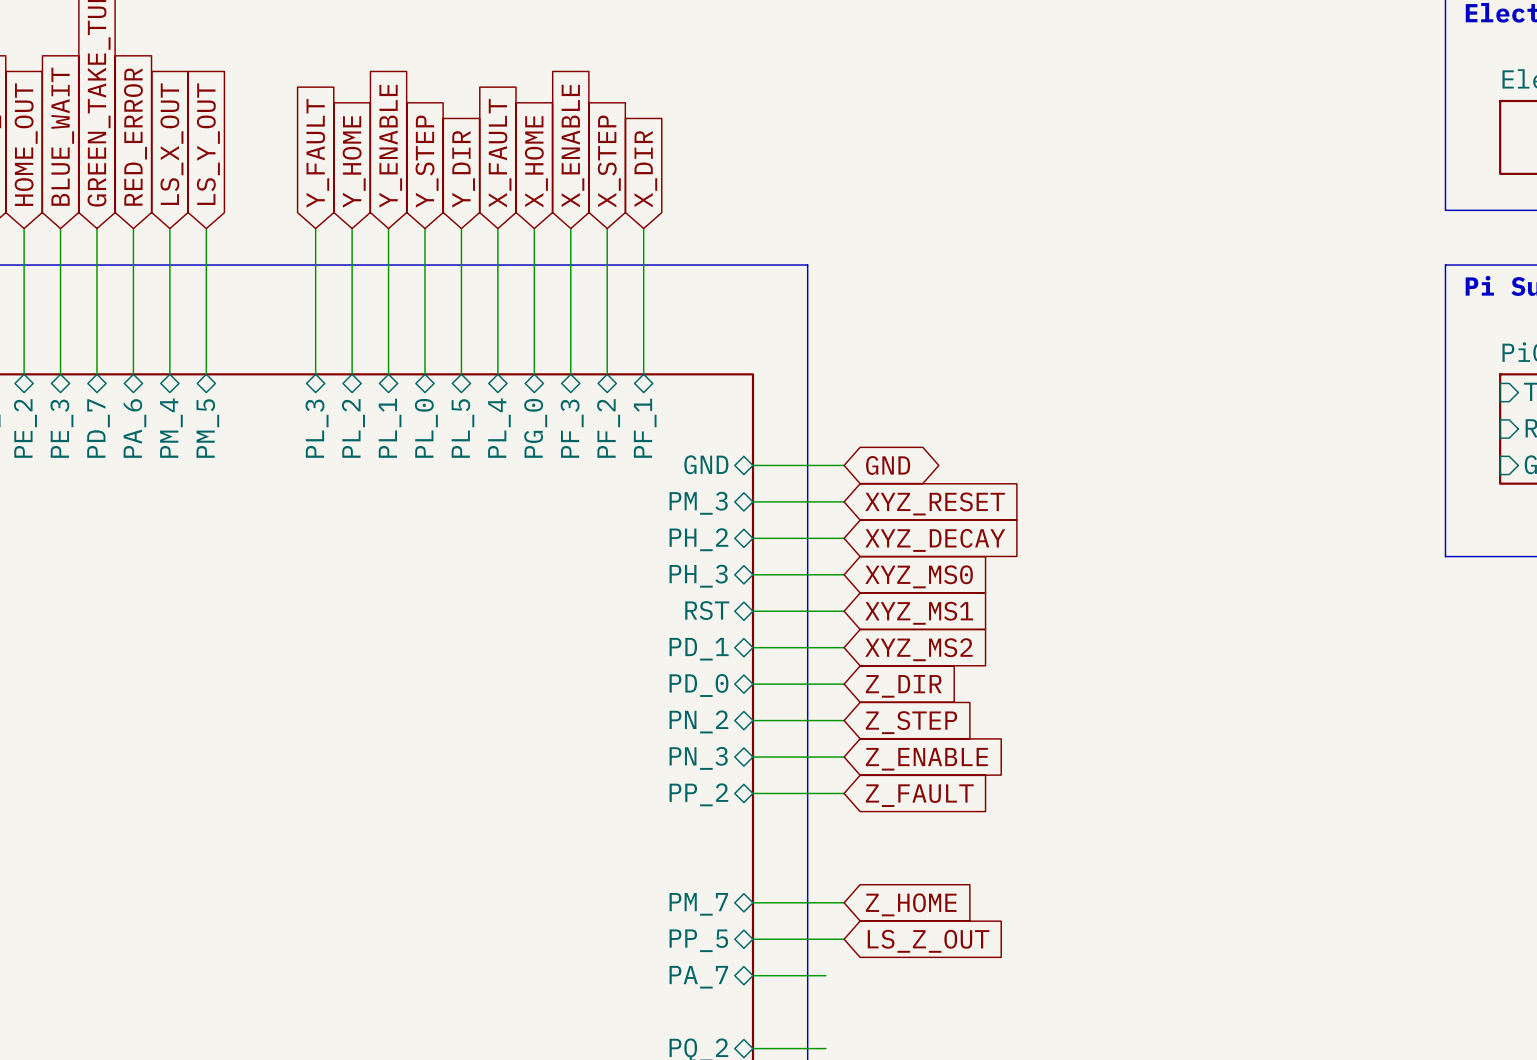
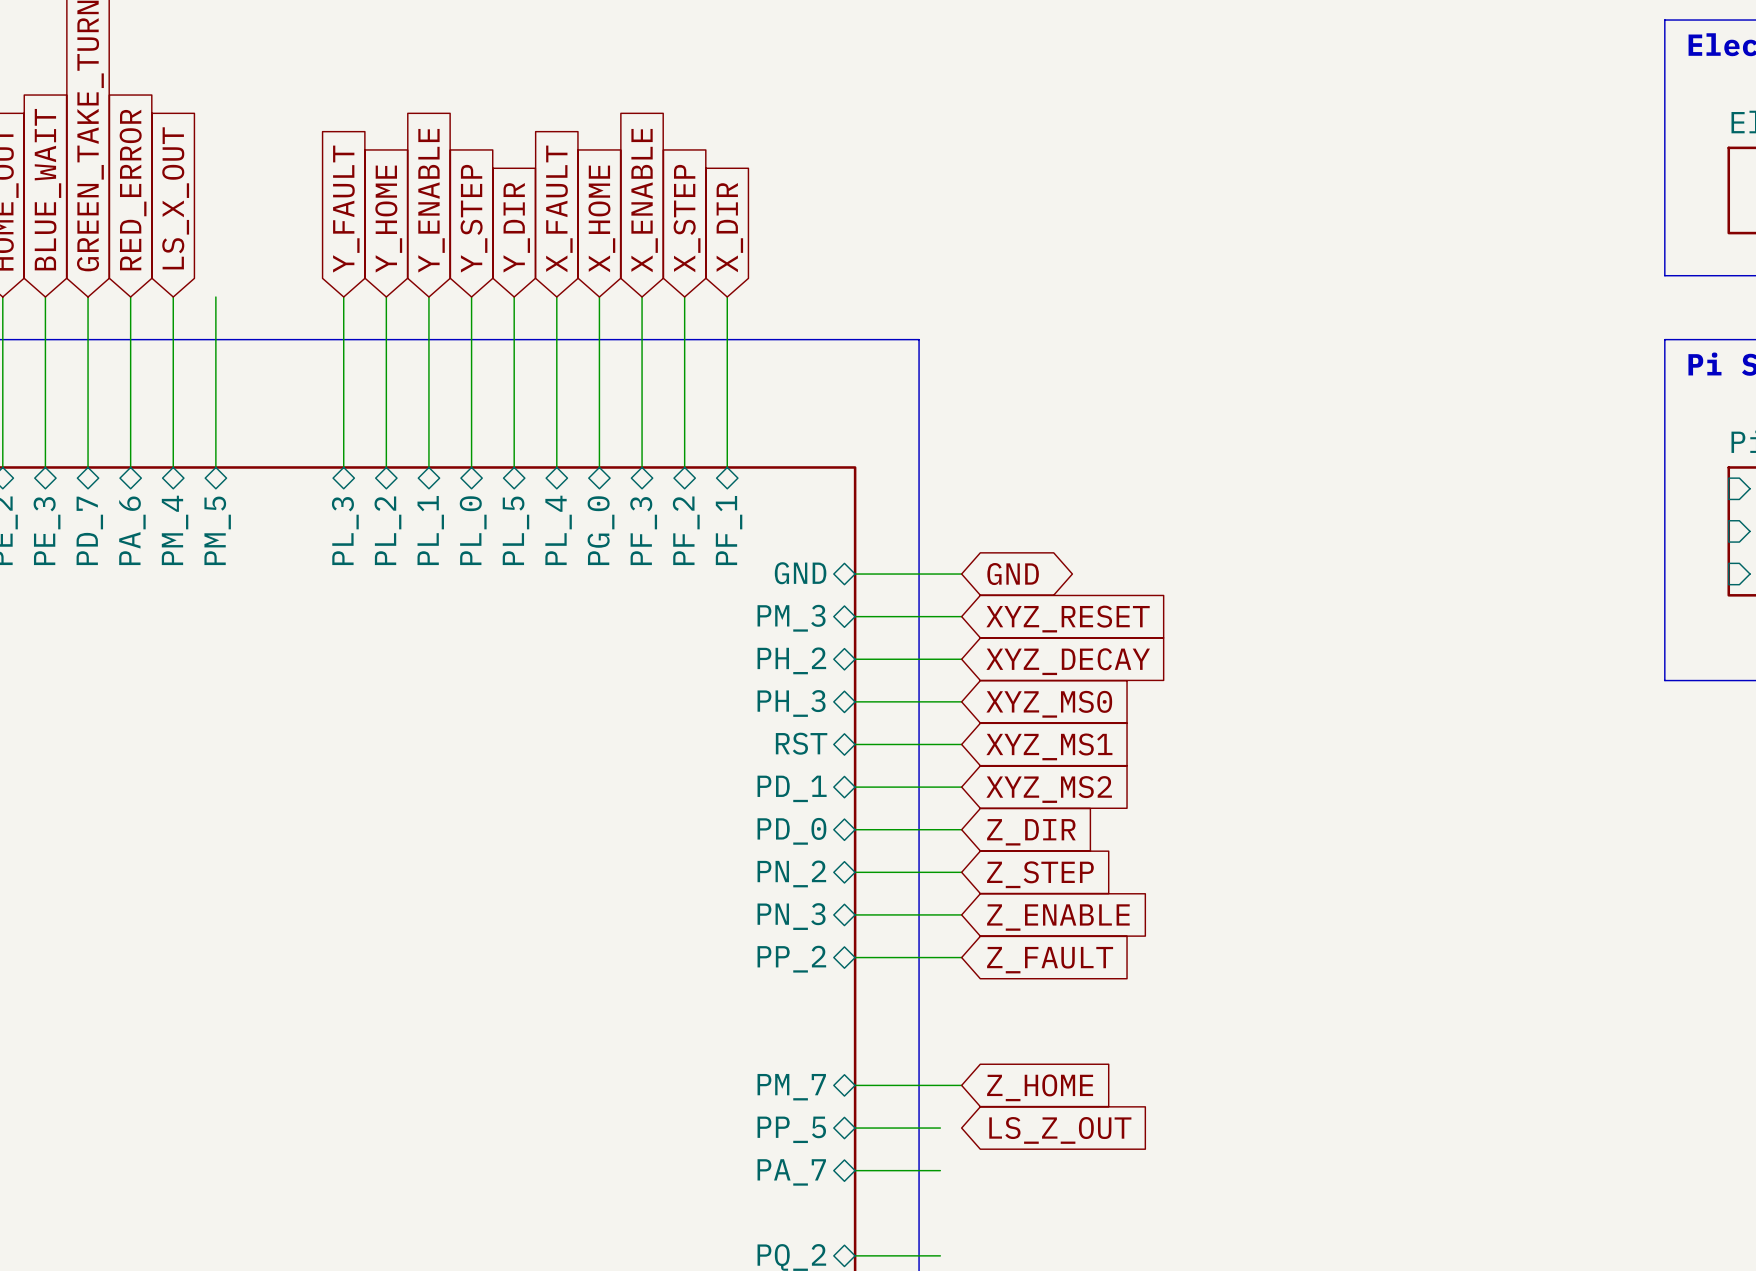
global label: LS_Y_OUT (208, 144) -> none
wire: (825, 939) (844, 939) -> none

